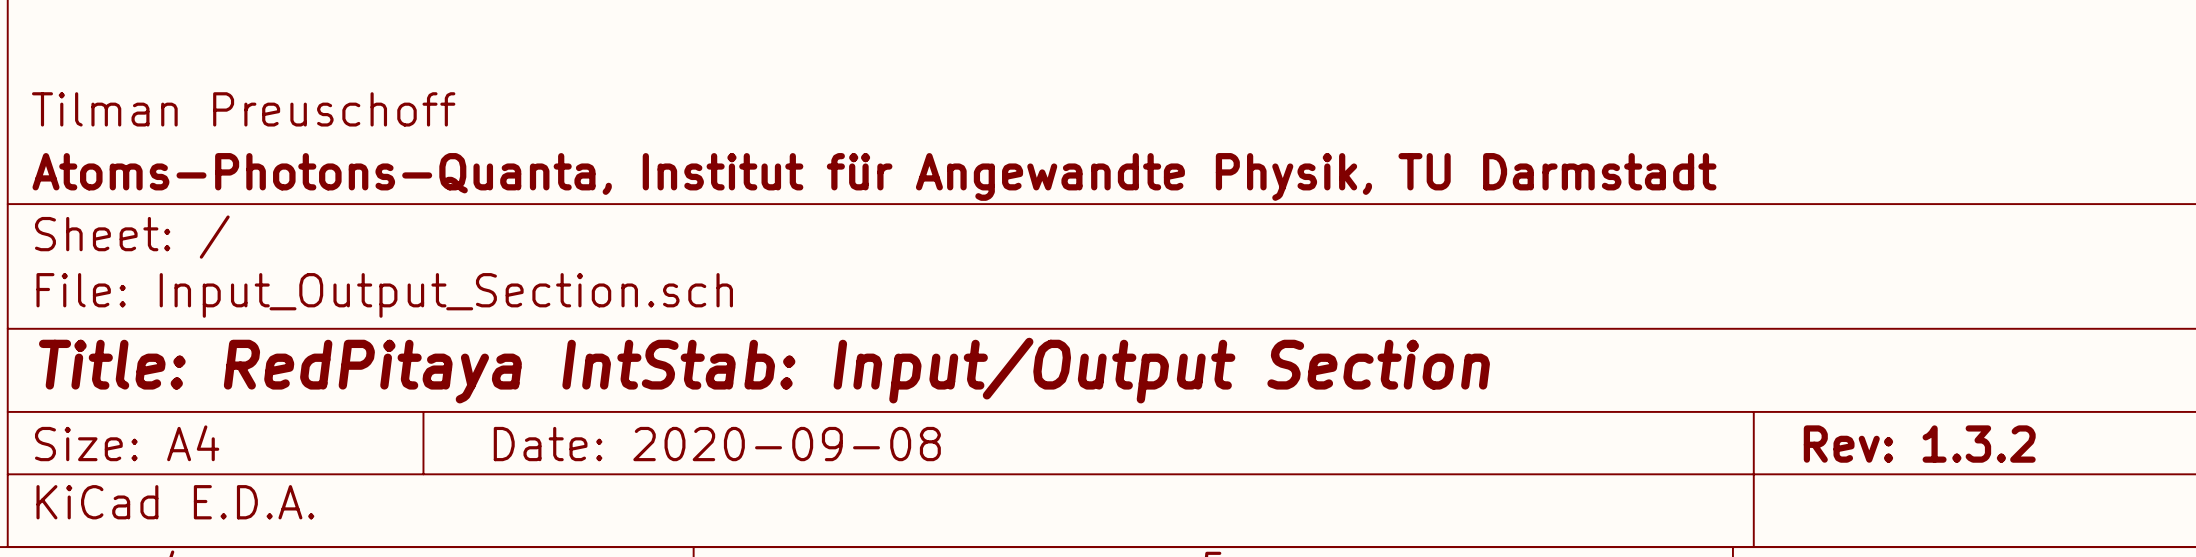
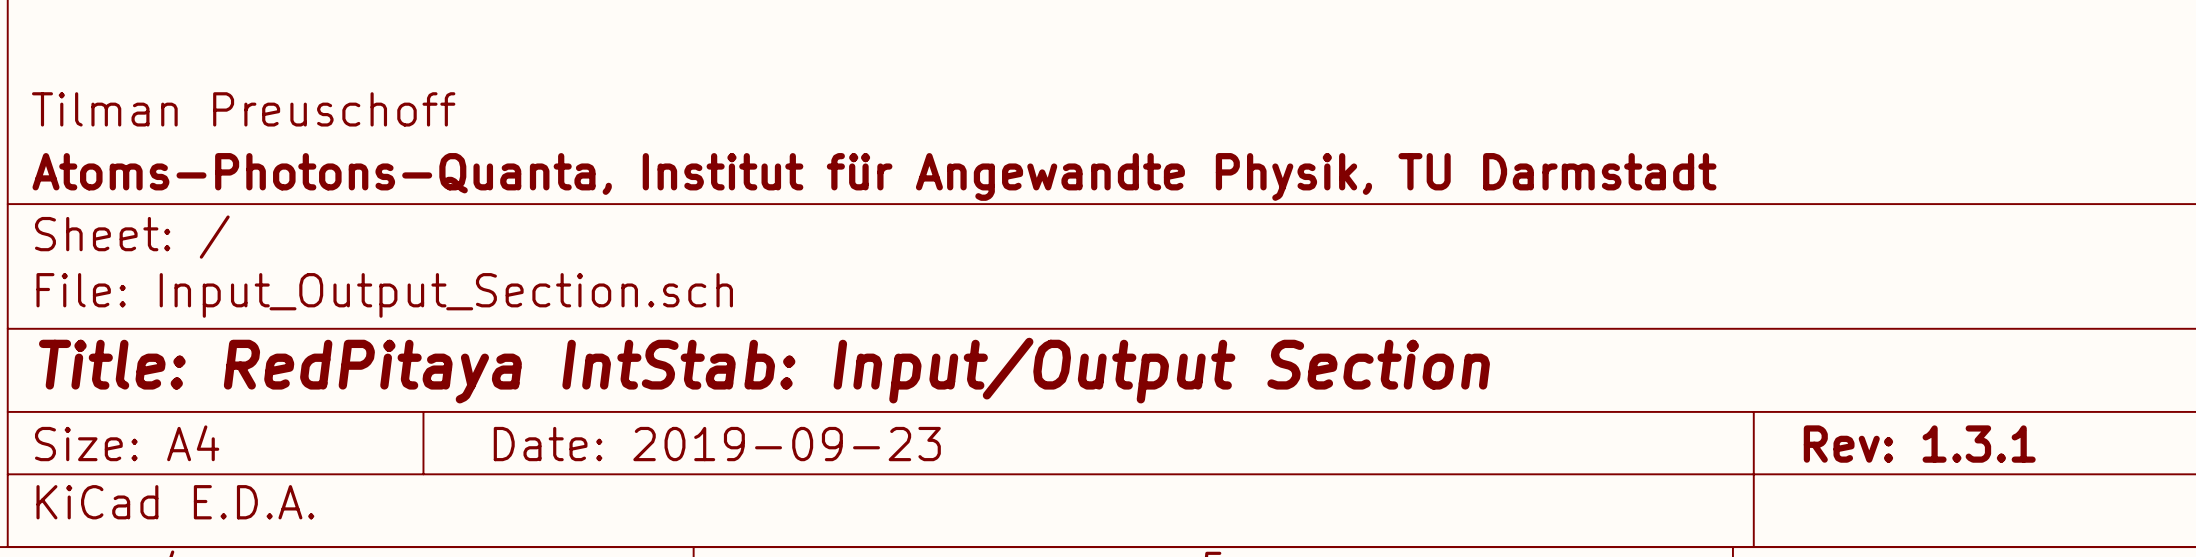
title block: Date: 2020-09-08 (717, 444) -> Date: 2019-09-23 (717, 444)
title block: Rev: 1.3.2 (1919, 444) -> Rev: 1.3.1 (1919, 444)

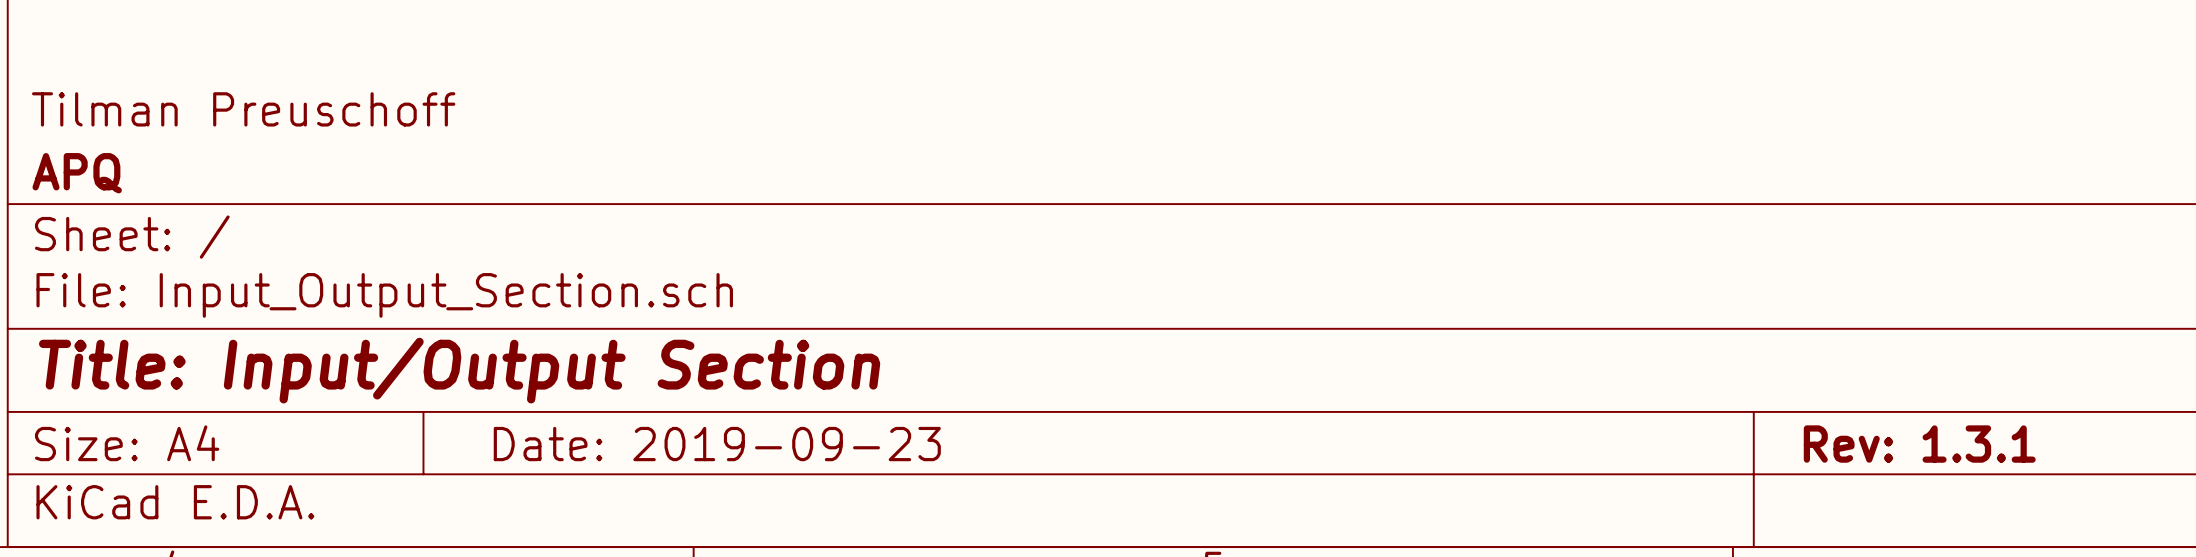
title block: Atoms-Photons-Quanta, Institut für Angewandte Physik, TU Darmstadt (874, 176) -> APQ (77, 173)
title block: Title: RedPitaya IntStab: Input/Output Section (764, 370) -> Title: Input/Output Section (459, 370)

